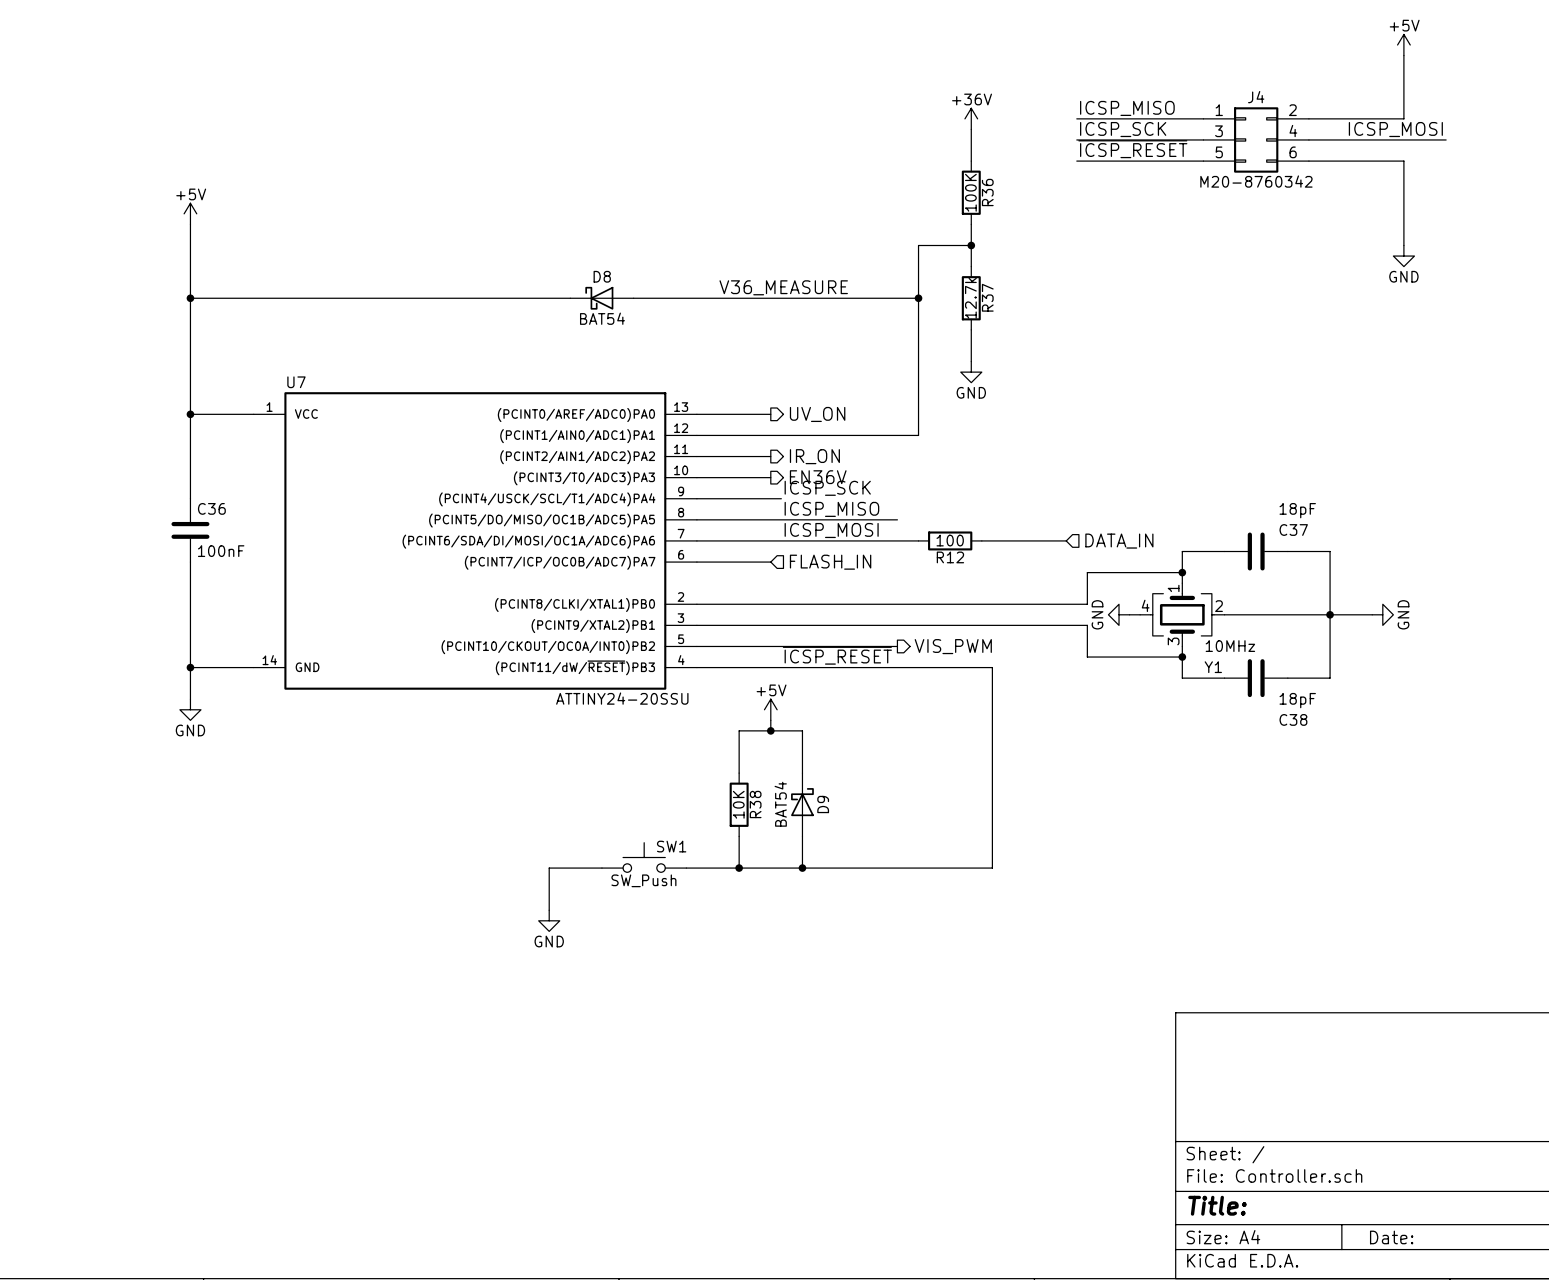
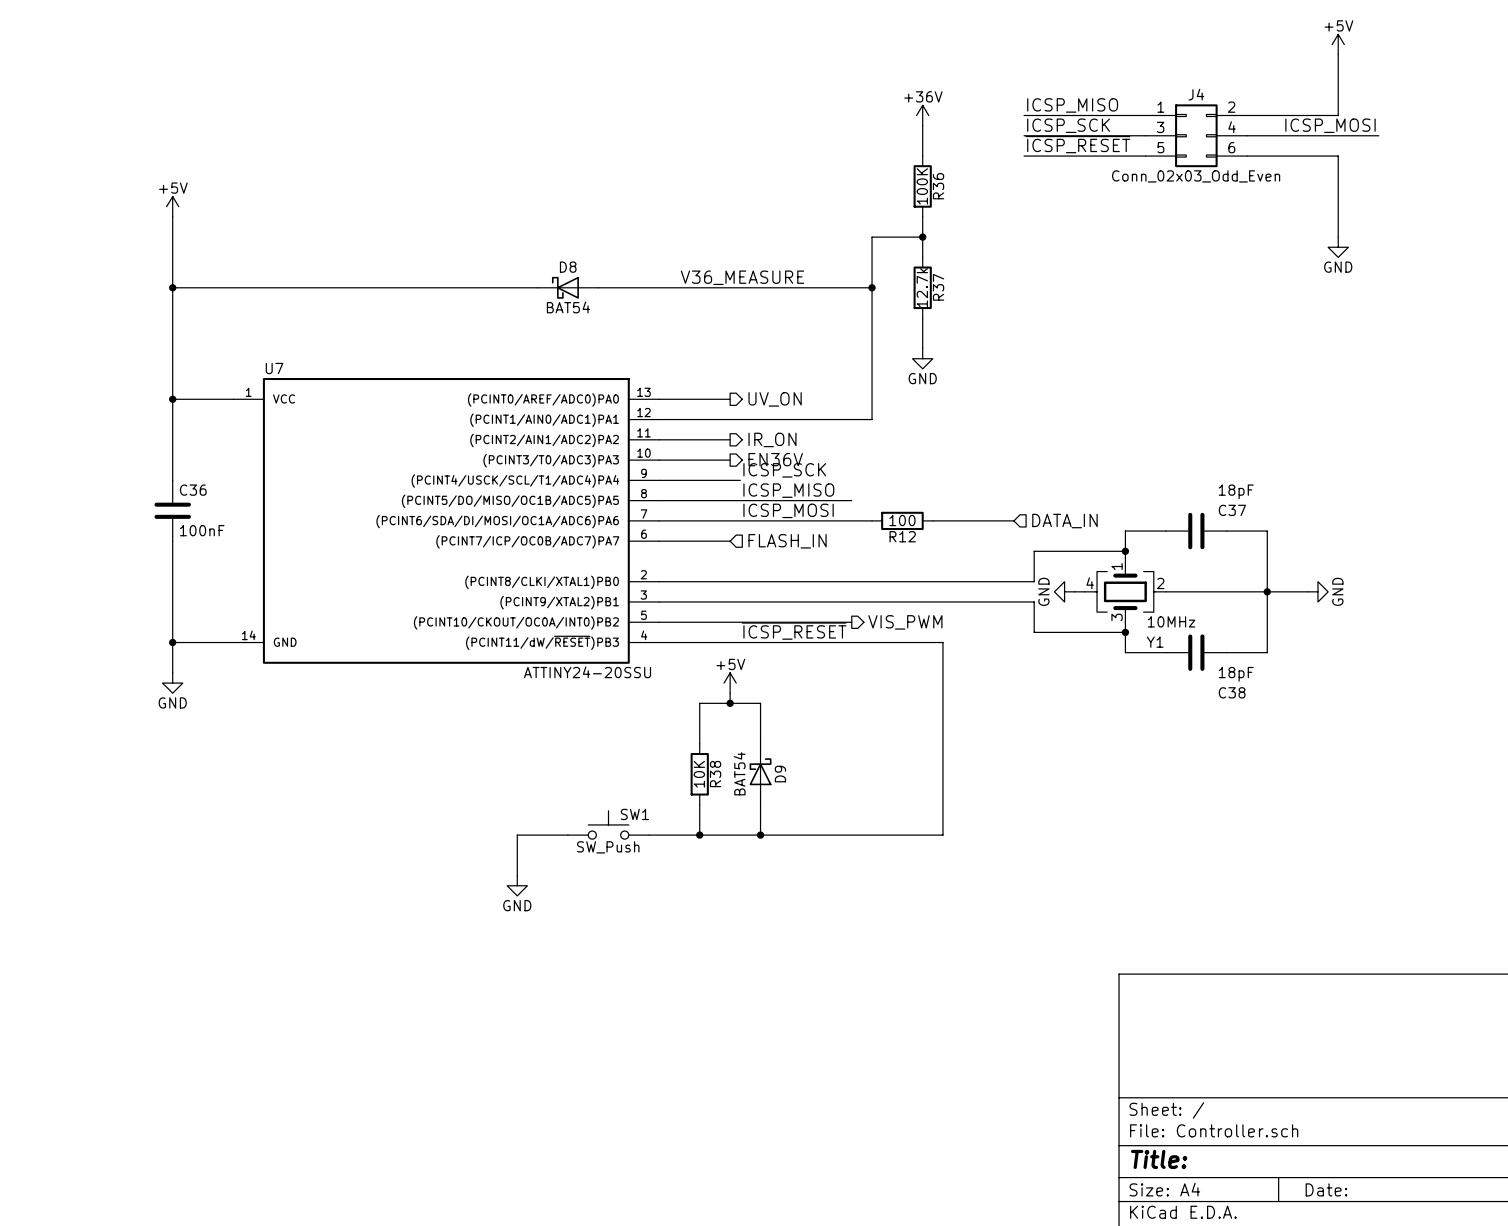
J4 value: M20-8760342 (1256, 181) -> Conn_02x03_Odd_Even (1196, 176)

